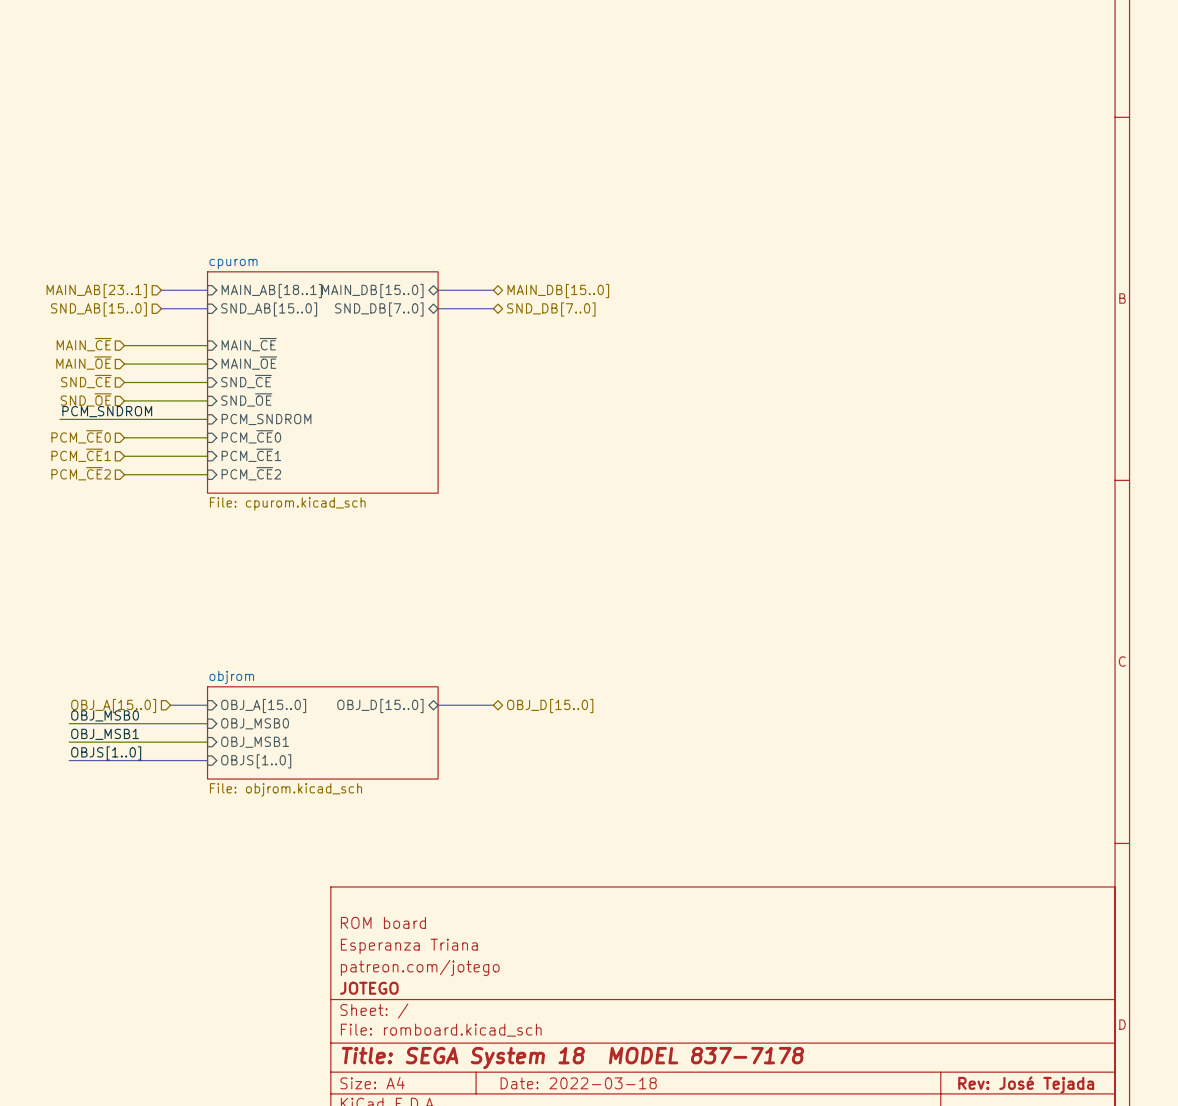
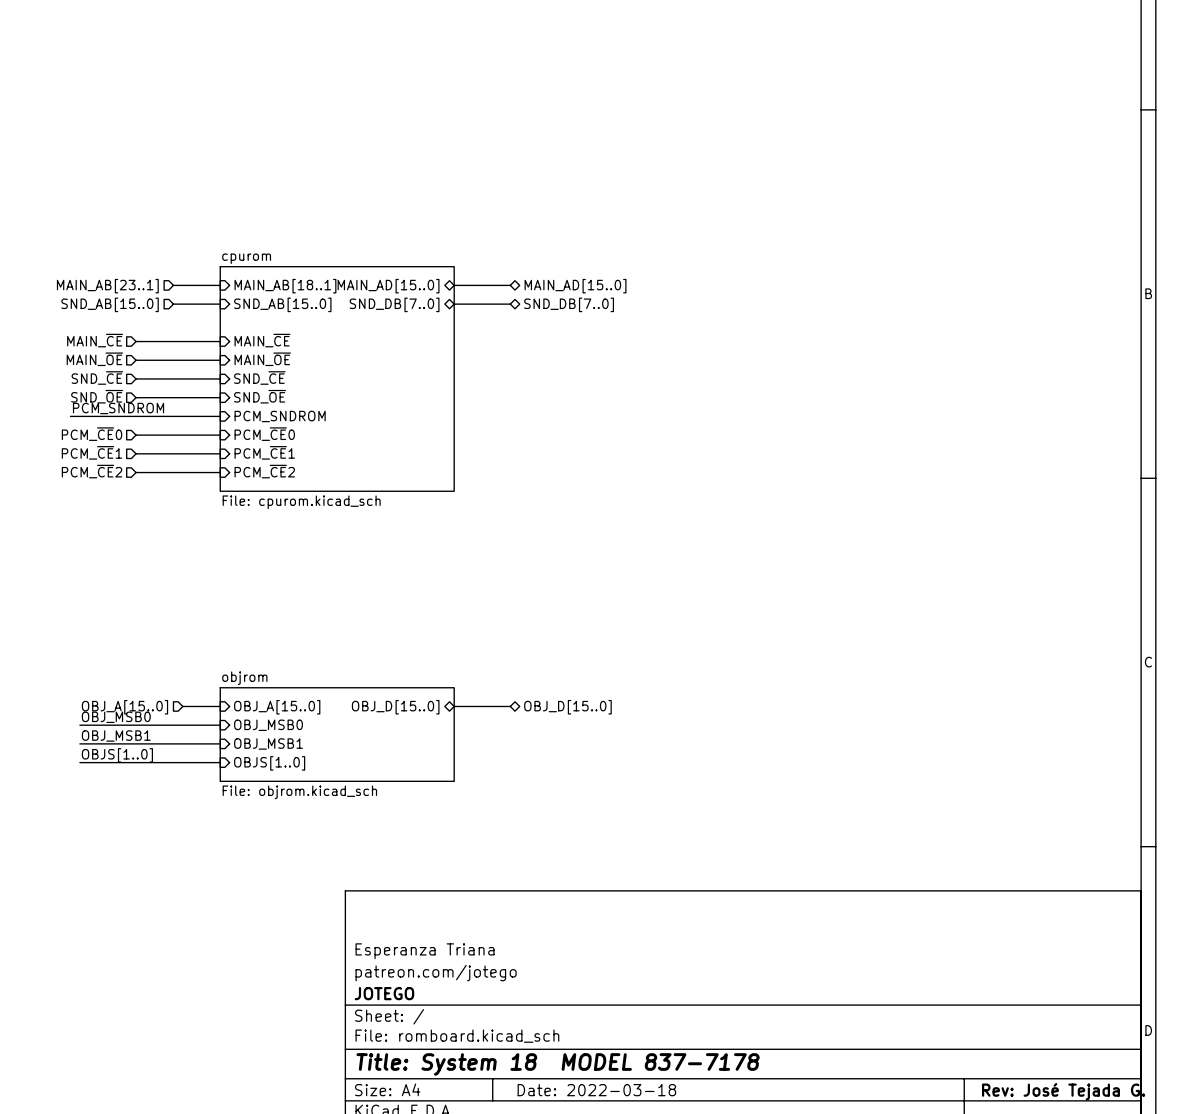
sheet pin: MAIN_DB[15..0] (372, 291) -> MAIN_AD[15..0] (388, 286)
hierarchical label: MAIN_DB[15..0] (558, 291) -> MAIN_AD[15..0] (575, 286)
title block: ROM board (383, 922) -> none
title block: Title: SEGA System 18 MODEL 837-7178 (572, 1058) -> Title: System 18 MODEL 837-7178 (558, 1064)
title block: Rev: José Tejada (1026, 1084) -> Rev: José Tejada G. (1063, 1091)

